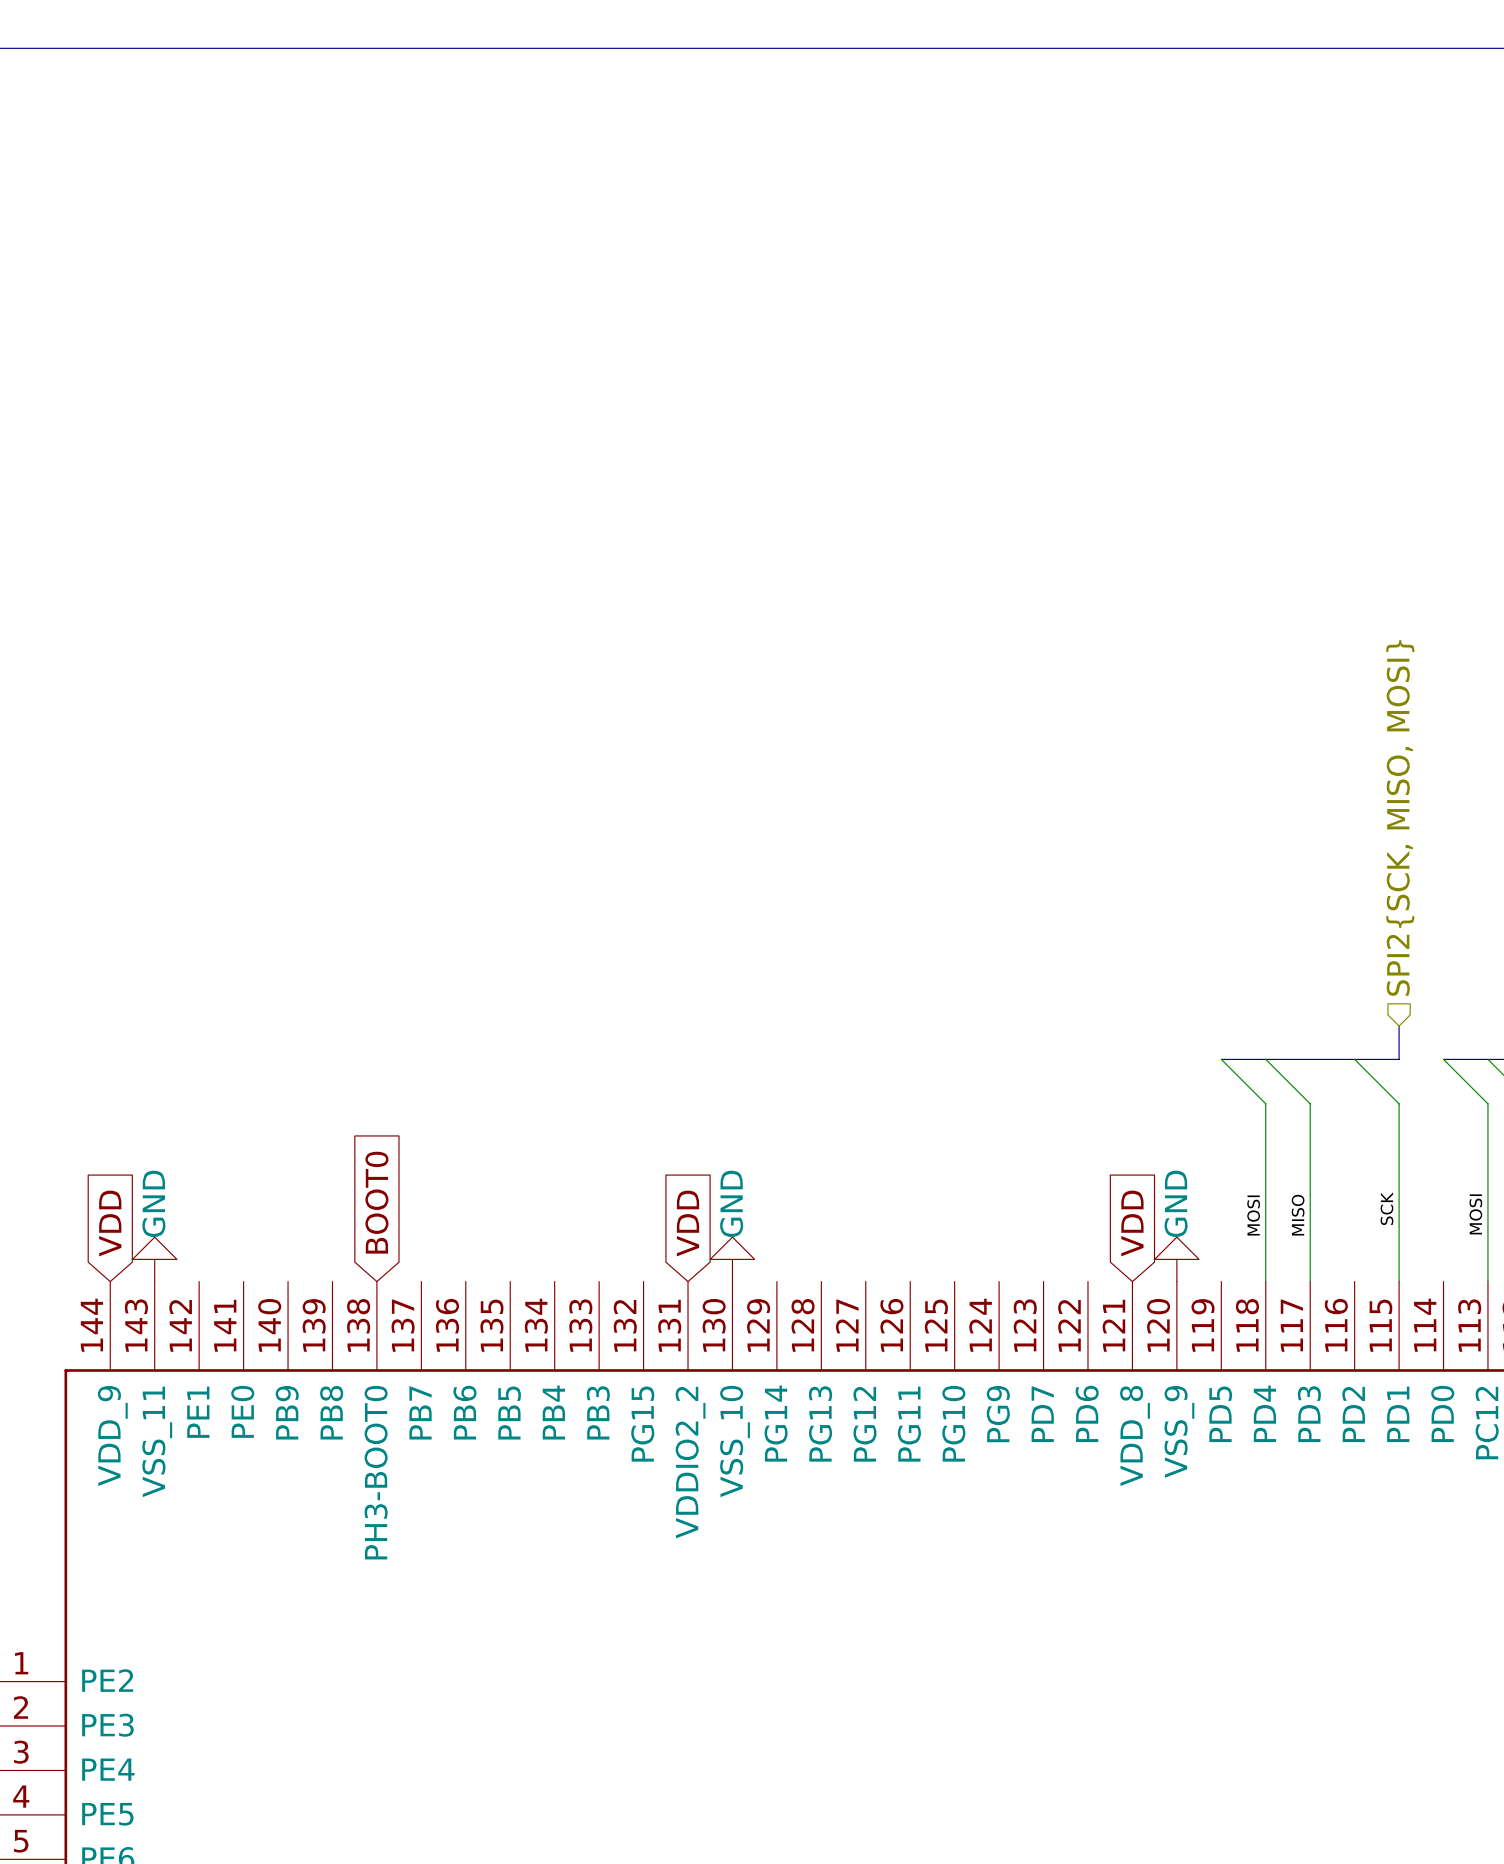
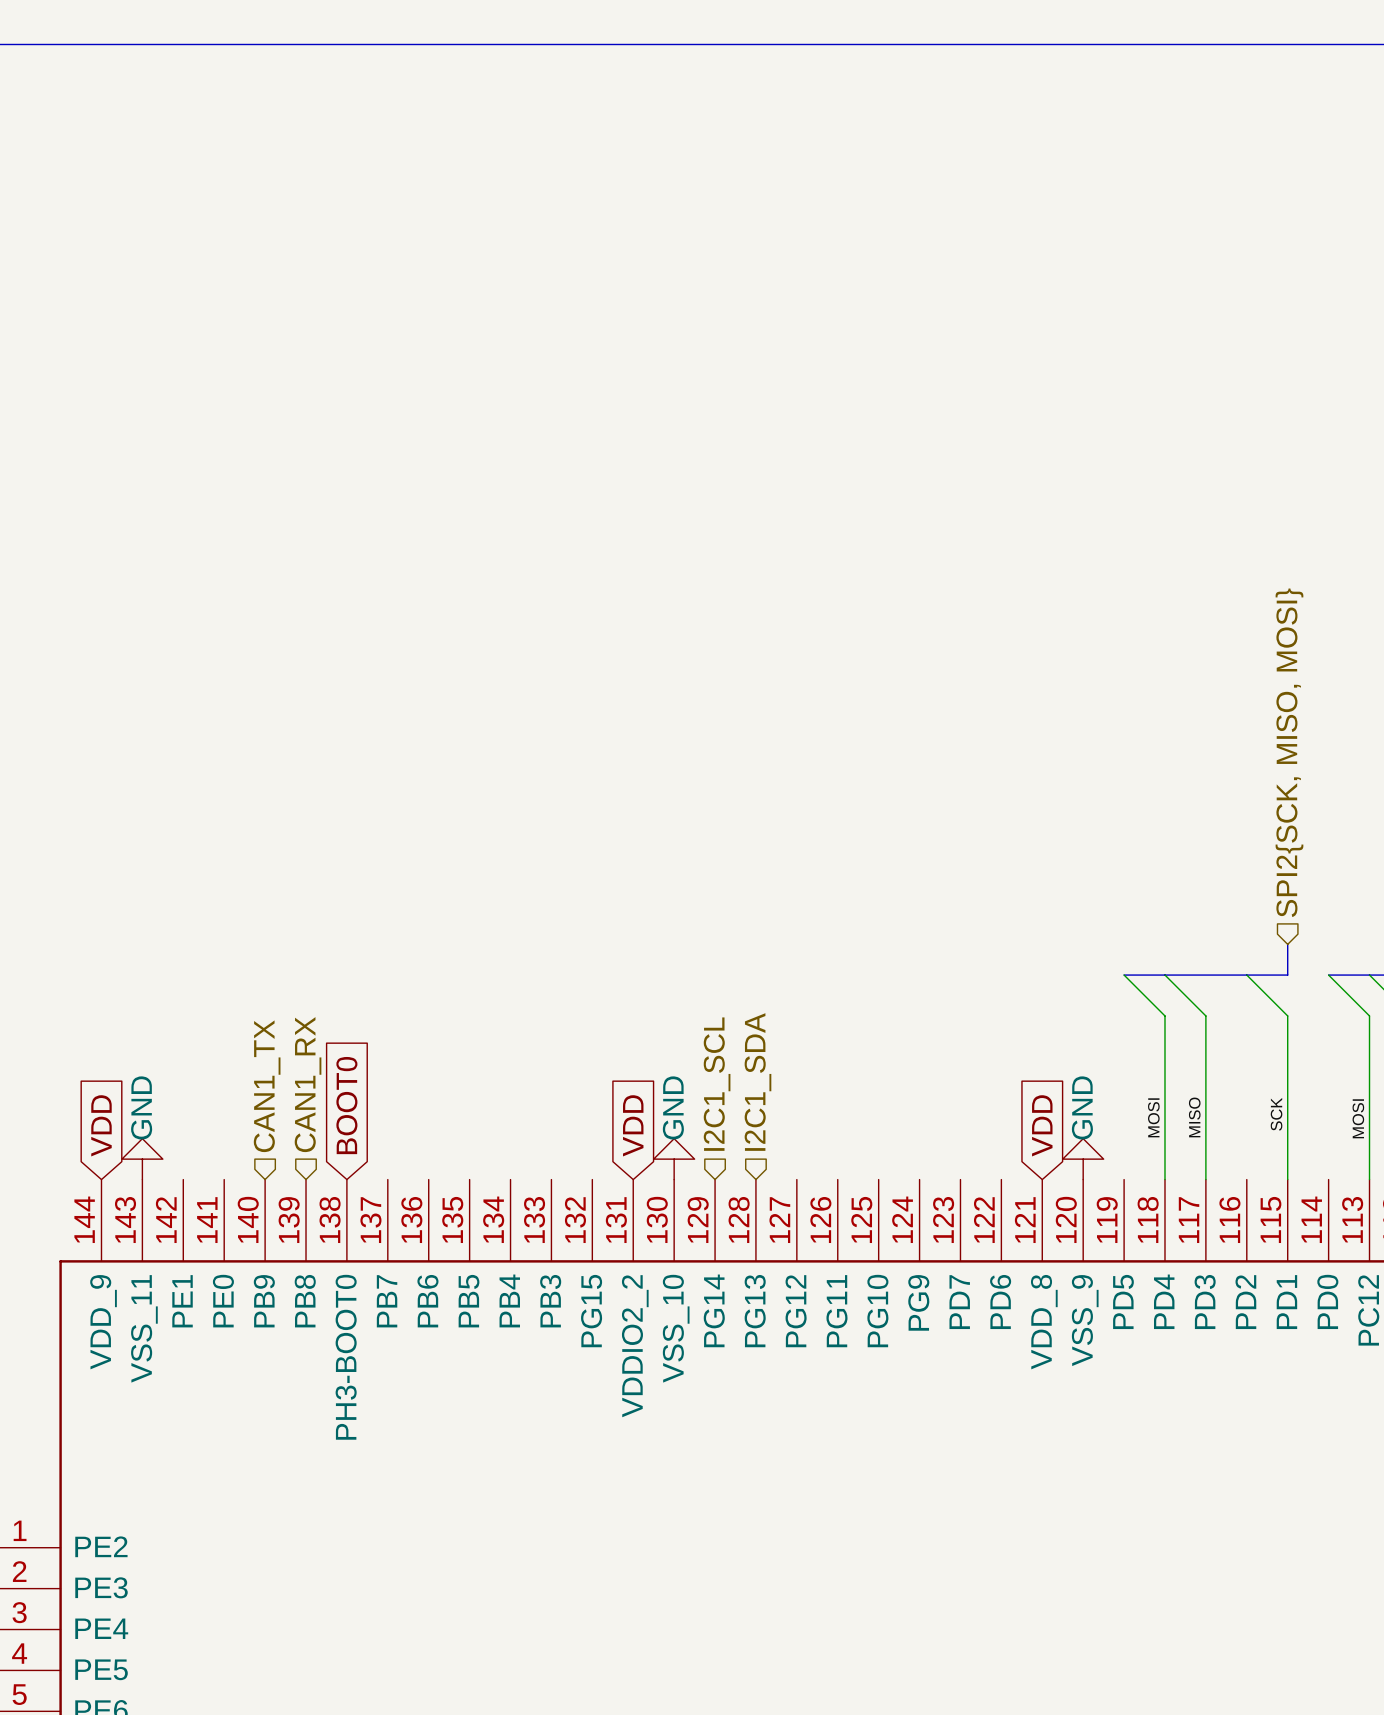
hierarchical label: none -> I2C1_SDA (757, 1082)
hierarchical label: none -> I2C1_SCL (717, 1084)
hierarchical label: none -> CAN1_RX (308, 1084)
hierarchical label: none -> CAN1_TX (267, 1086)

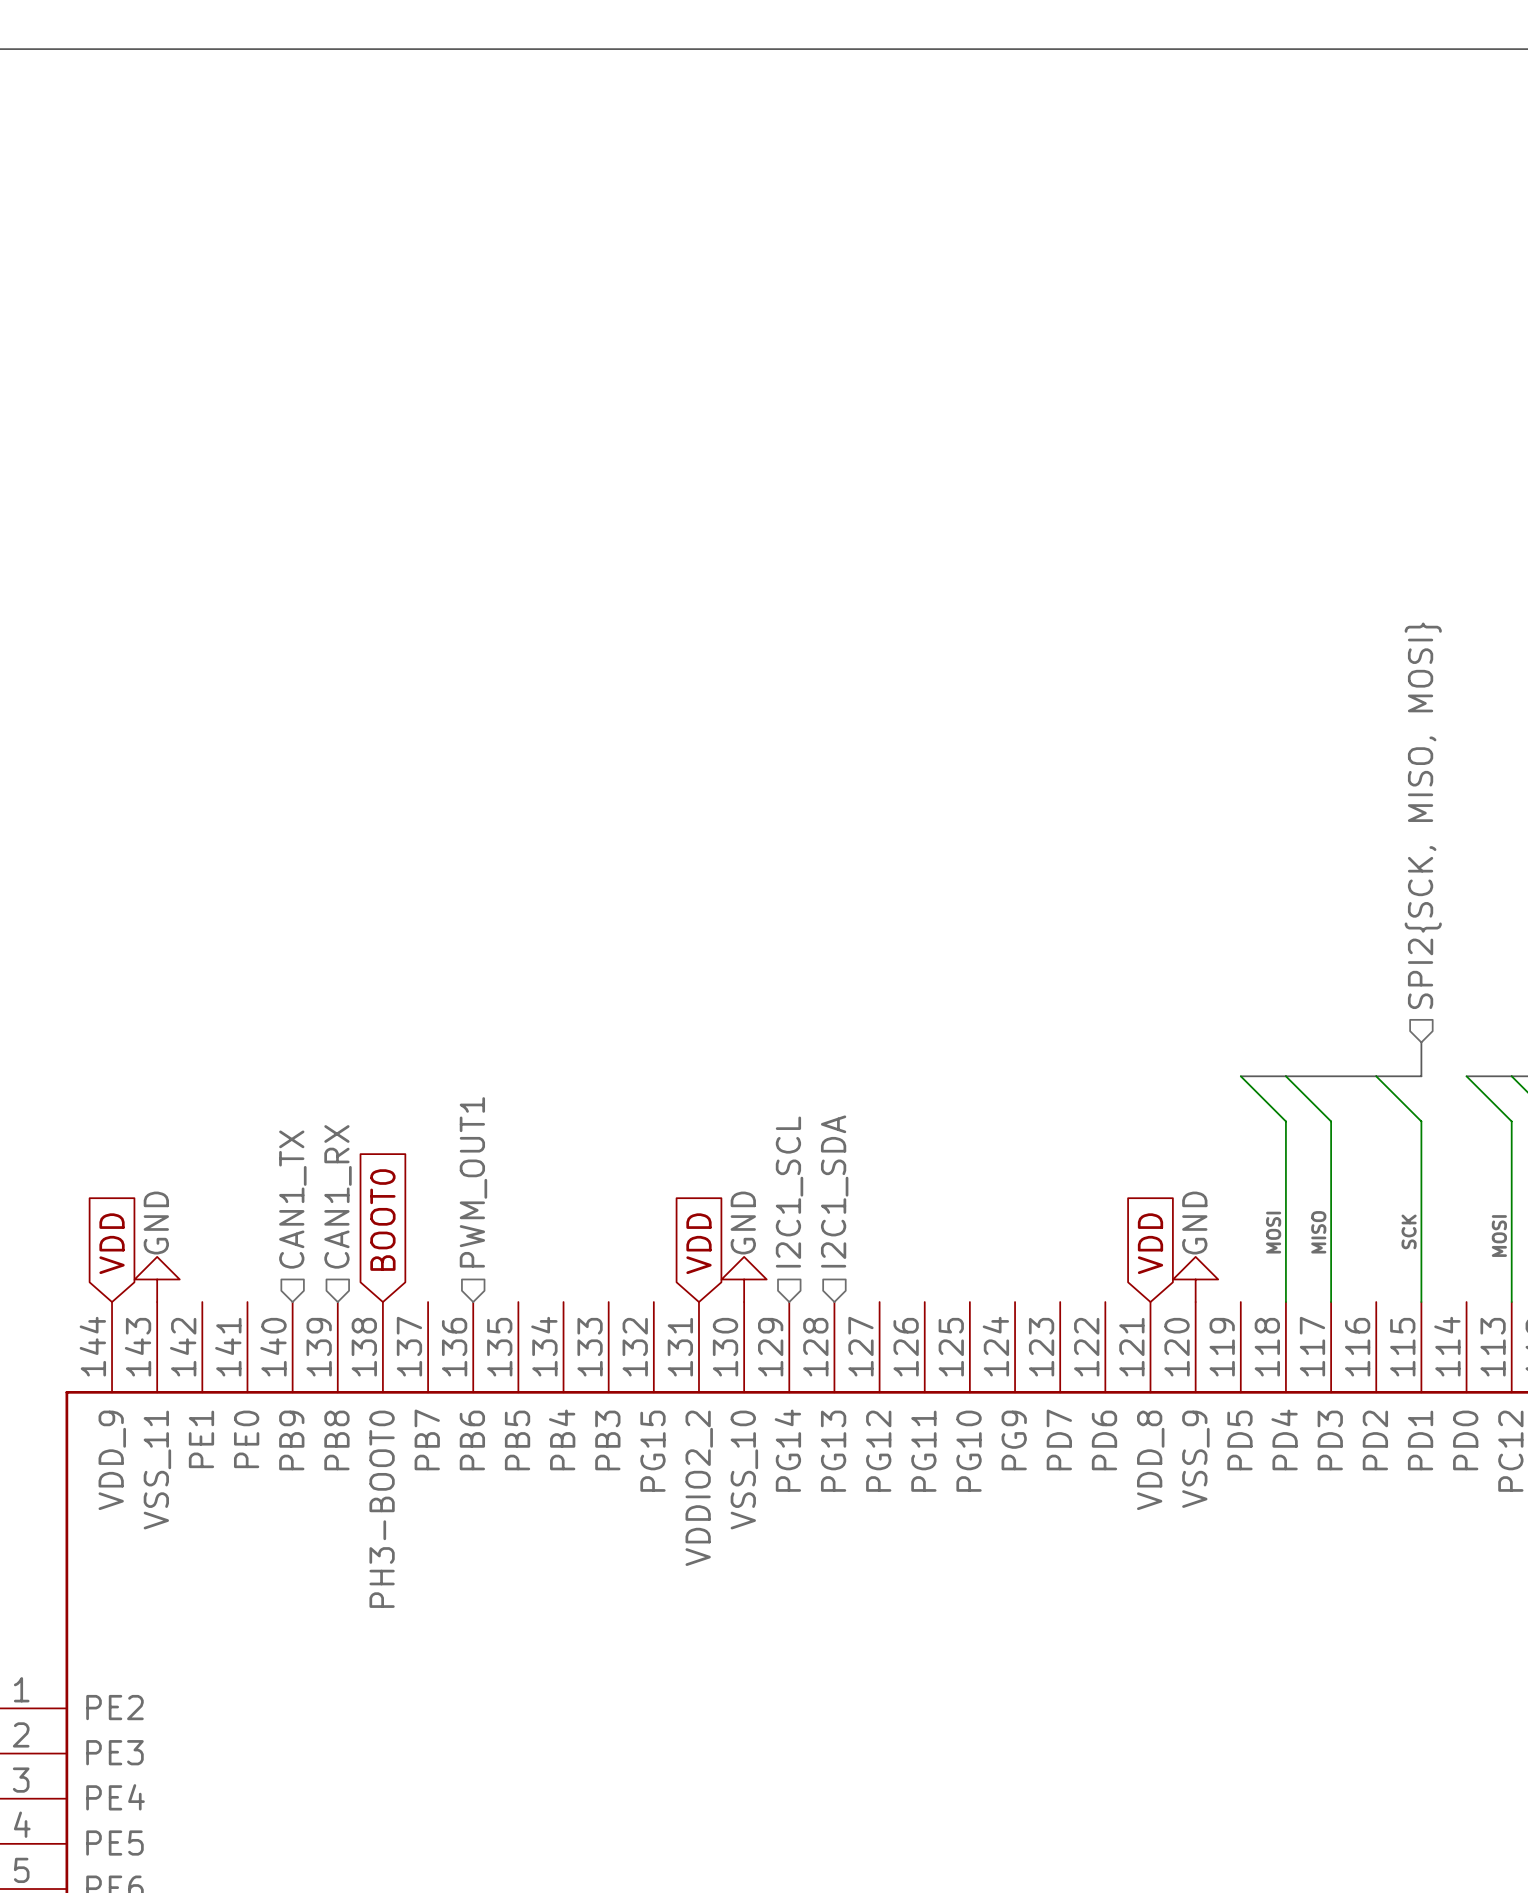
hierarchical label: none -> PWM_OUT1 (473, 1182)

